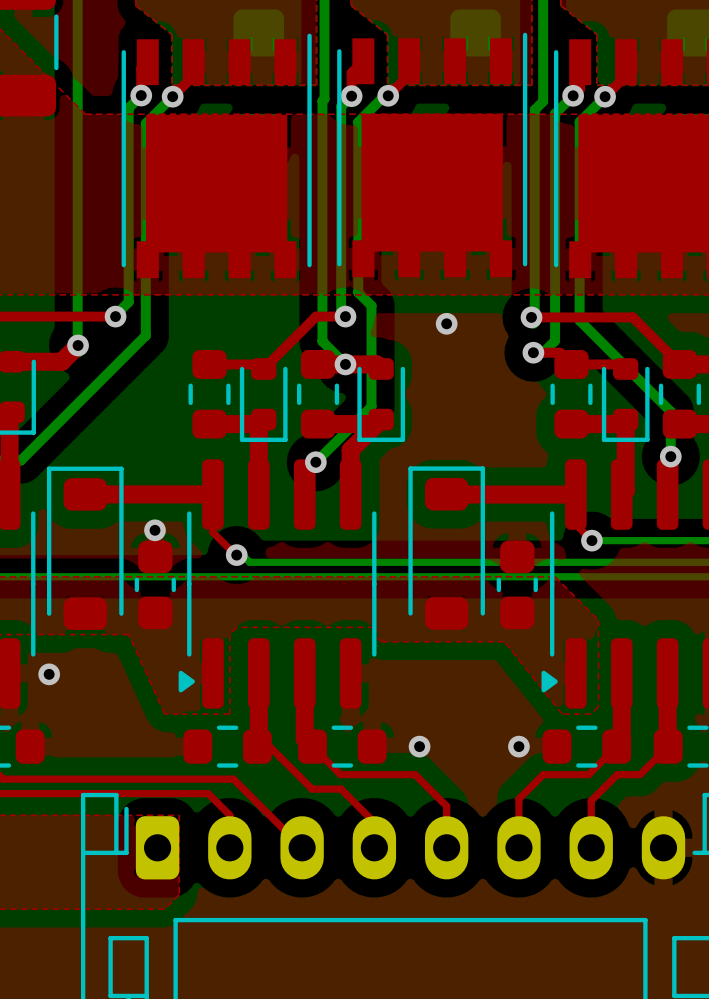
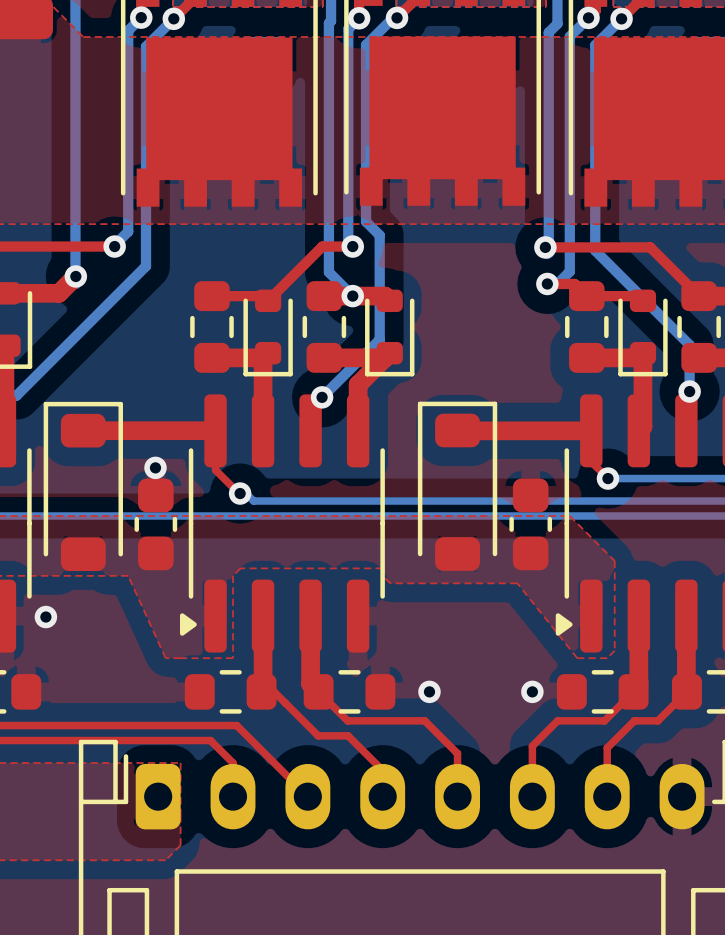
via: (446, 323) -> none

